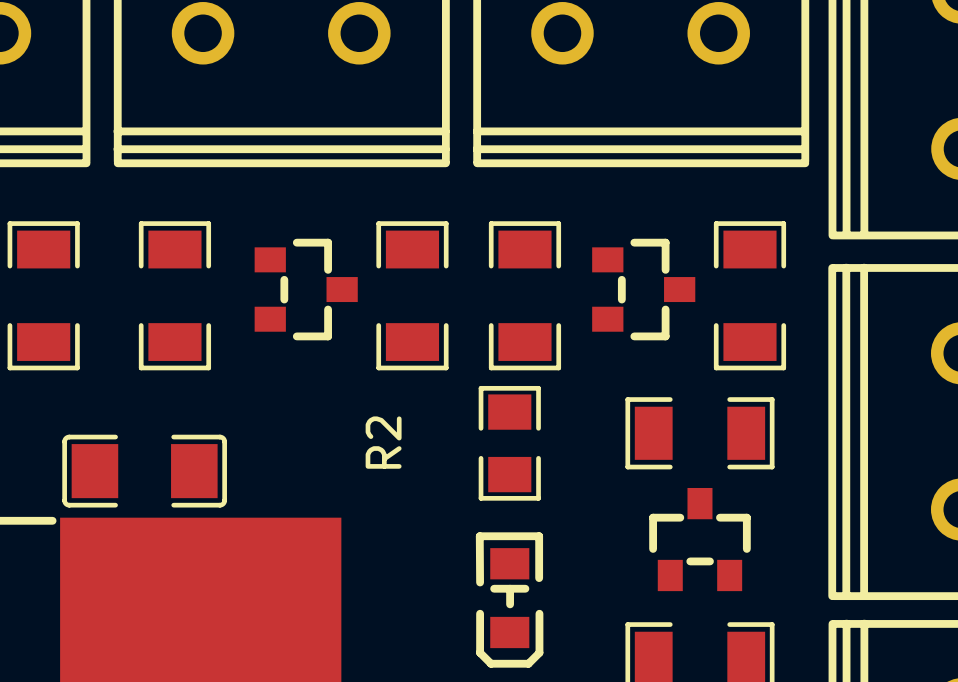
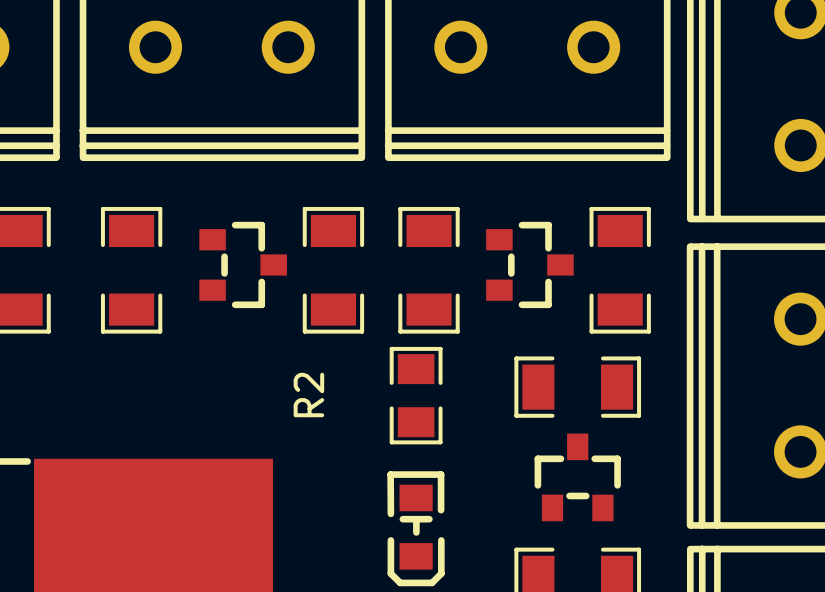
part: (144, 471) -> none

